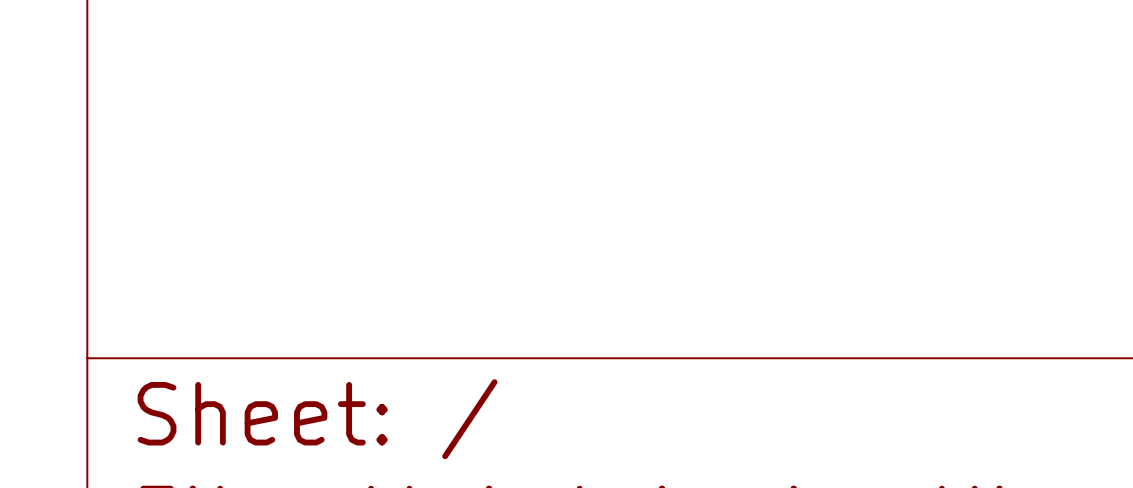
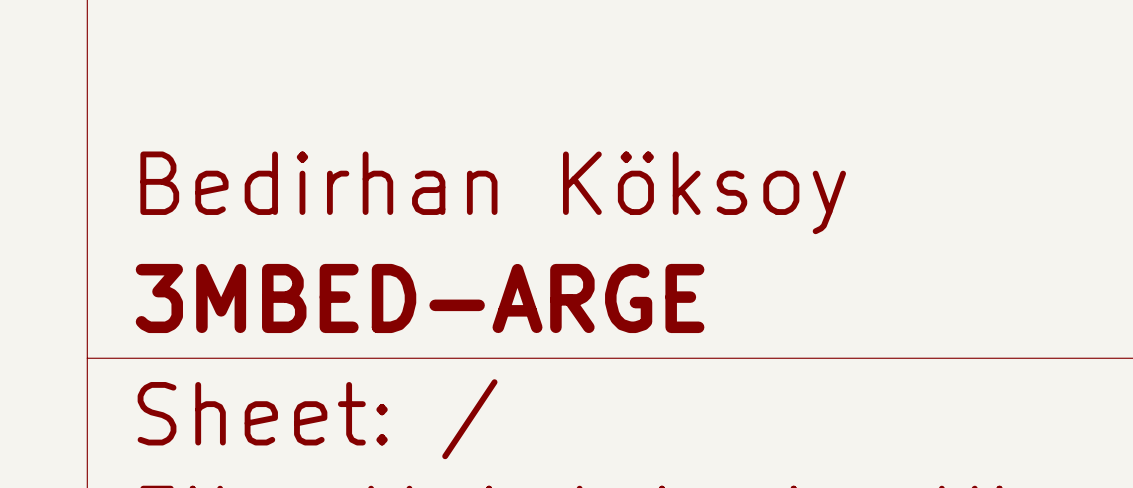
title block: none -> Bedirhan Köksoy (493, 192)
title block: none -> 3MBED-ARGE (420, 298)

